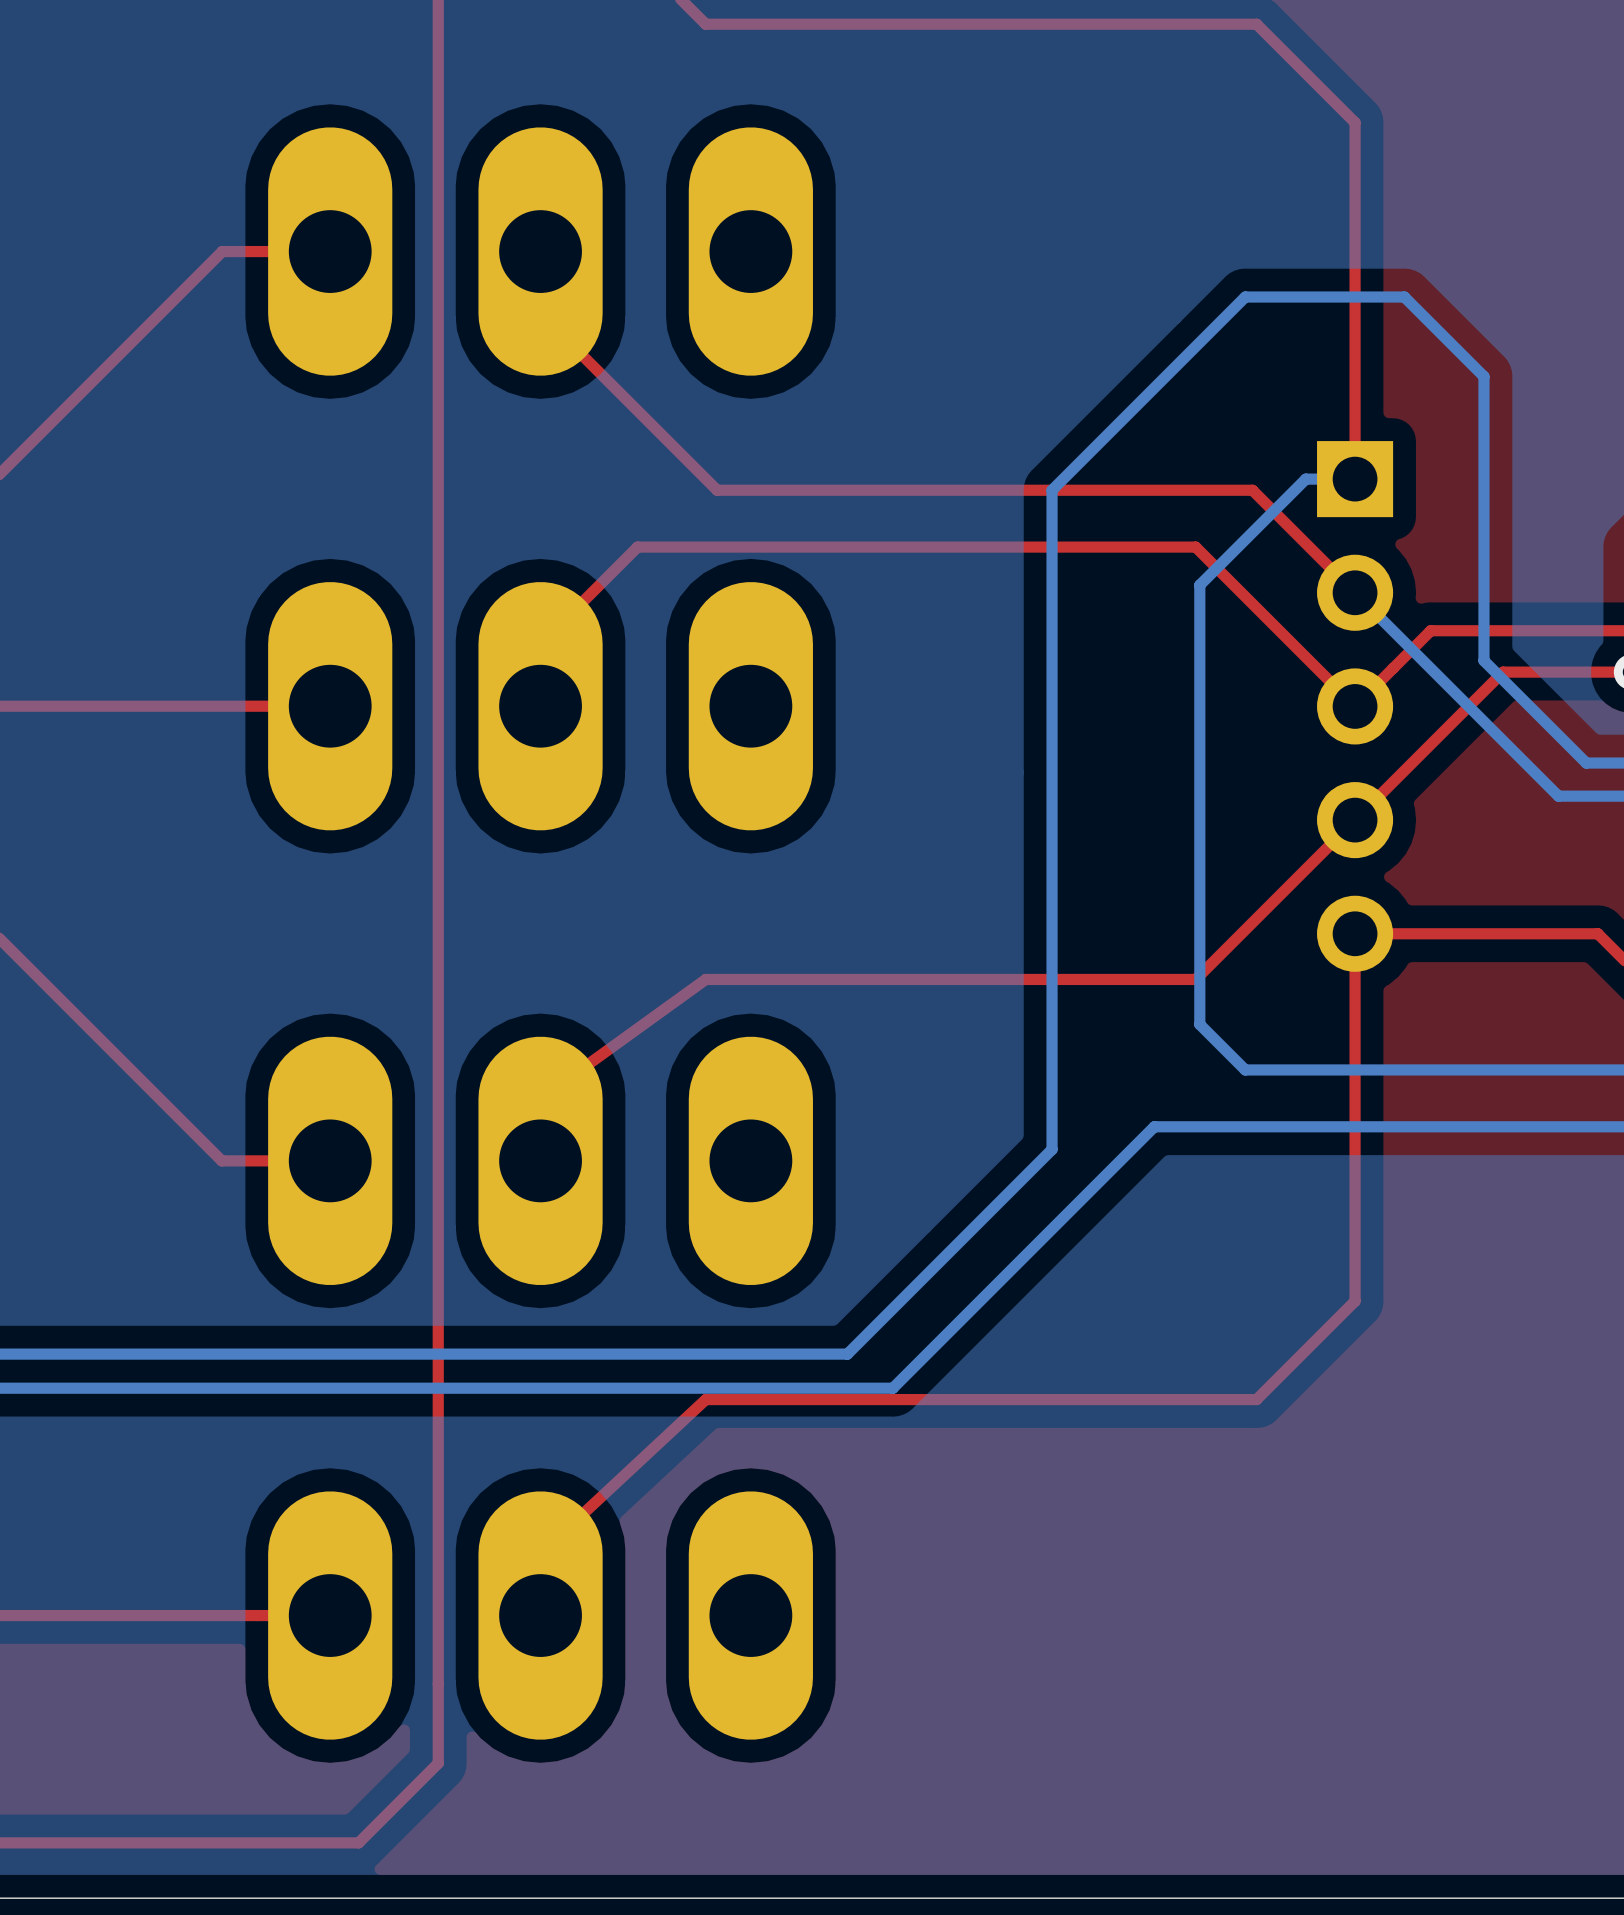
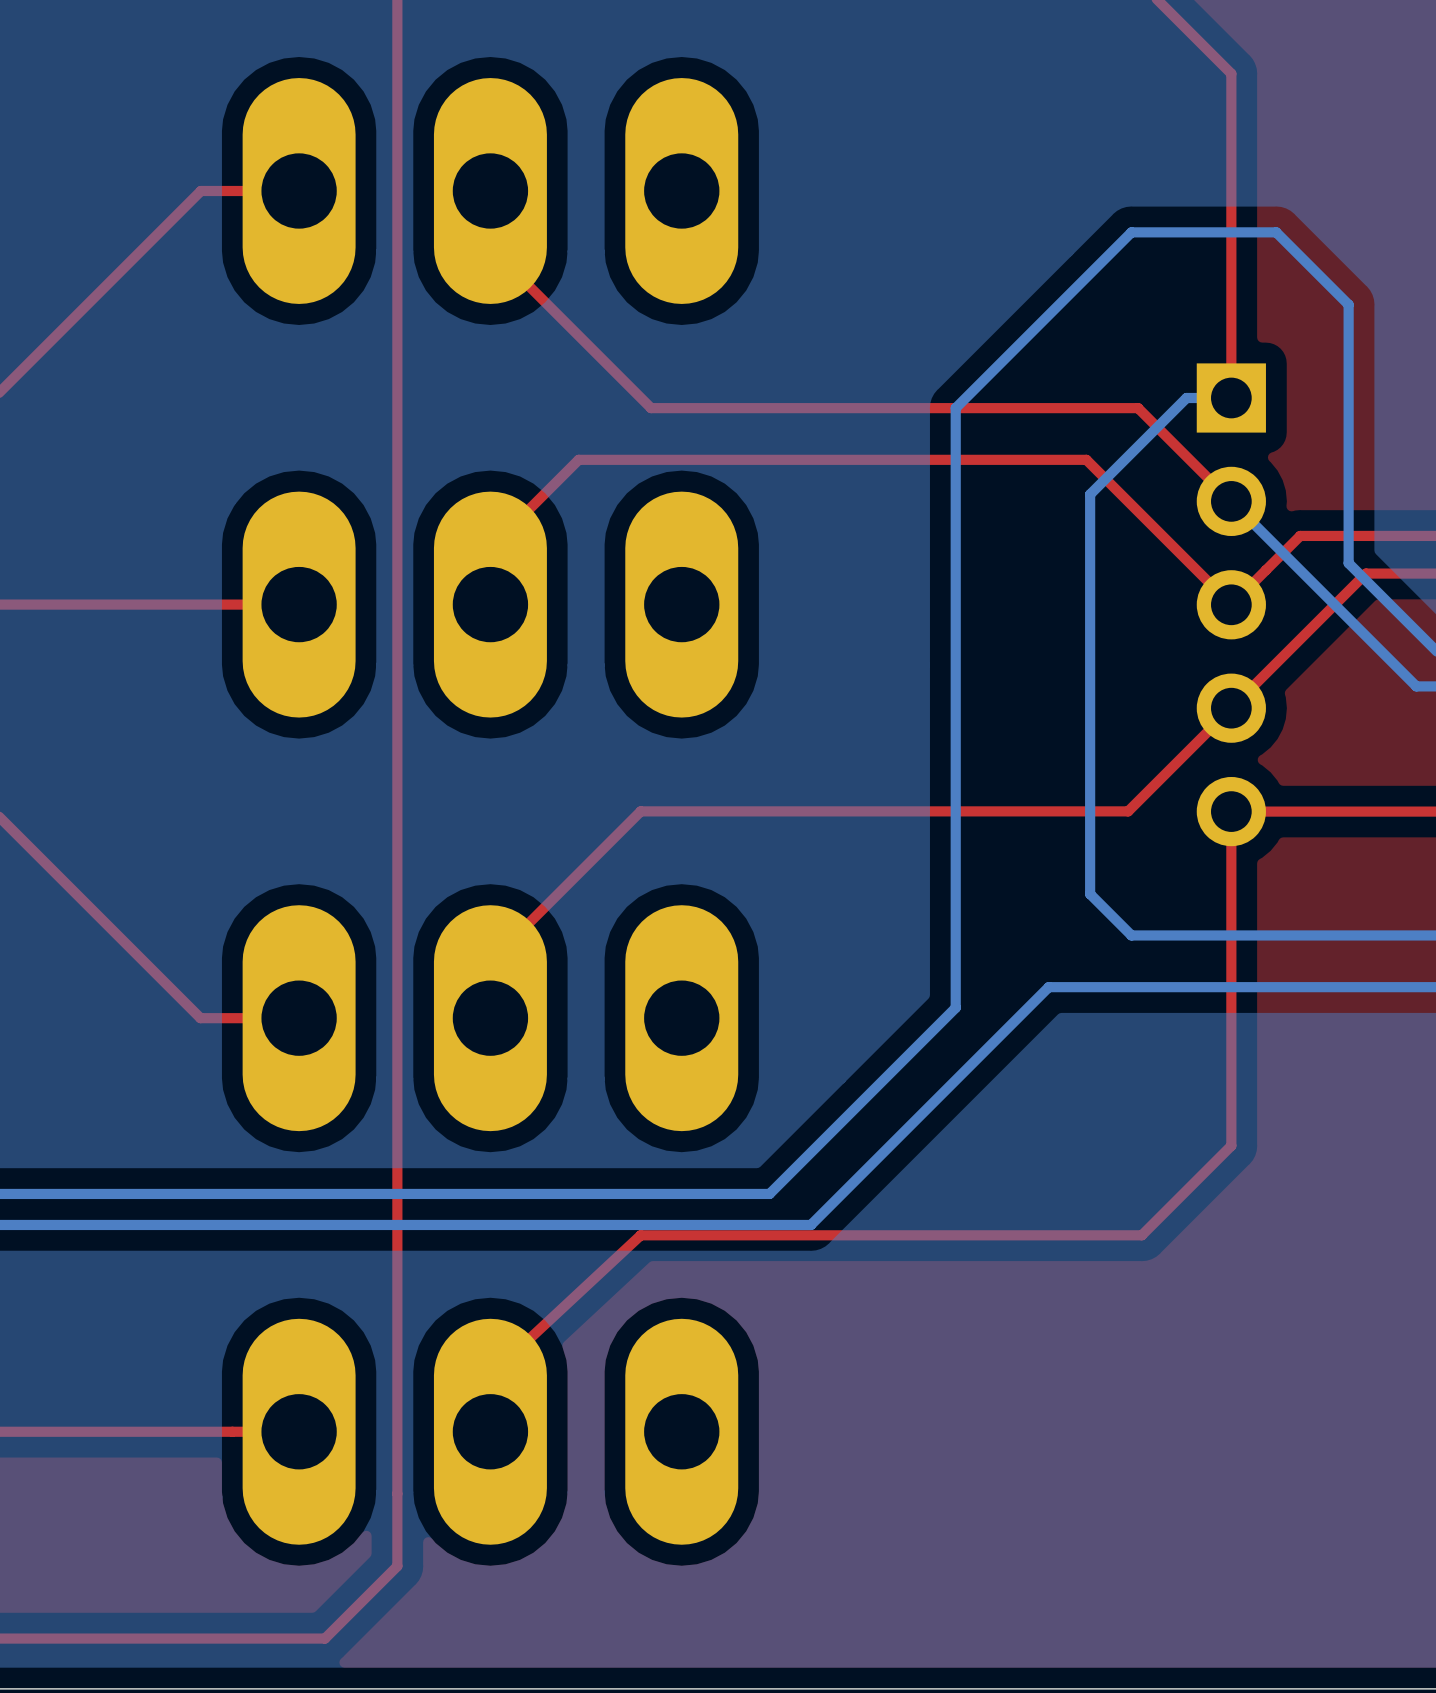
top track: (1241, 933) (1195, 979) (705, 979) (540, 1098) -> (1128, 811) (640, 811) (490, 961)

